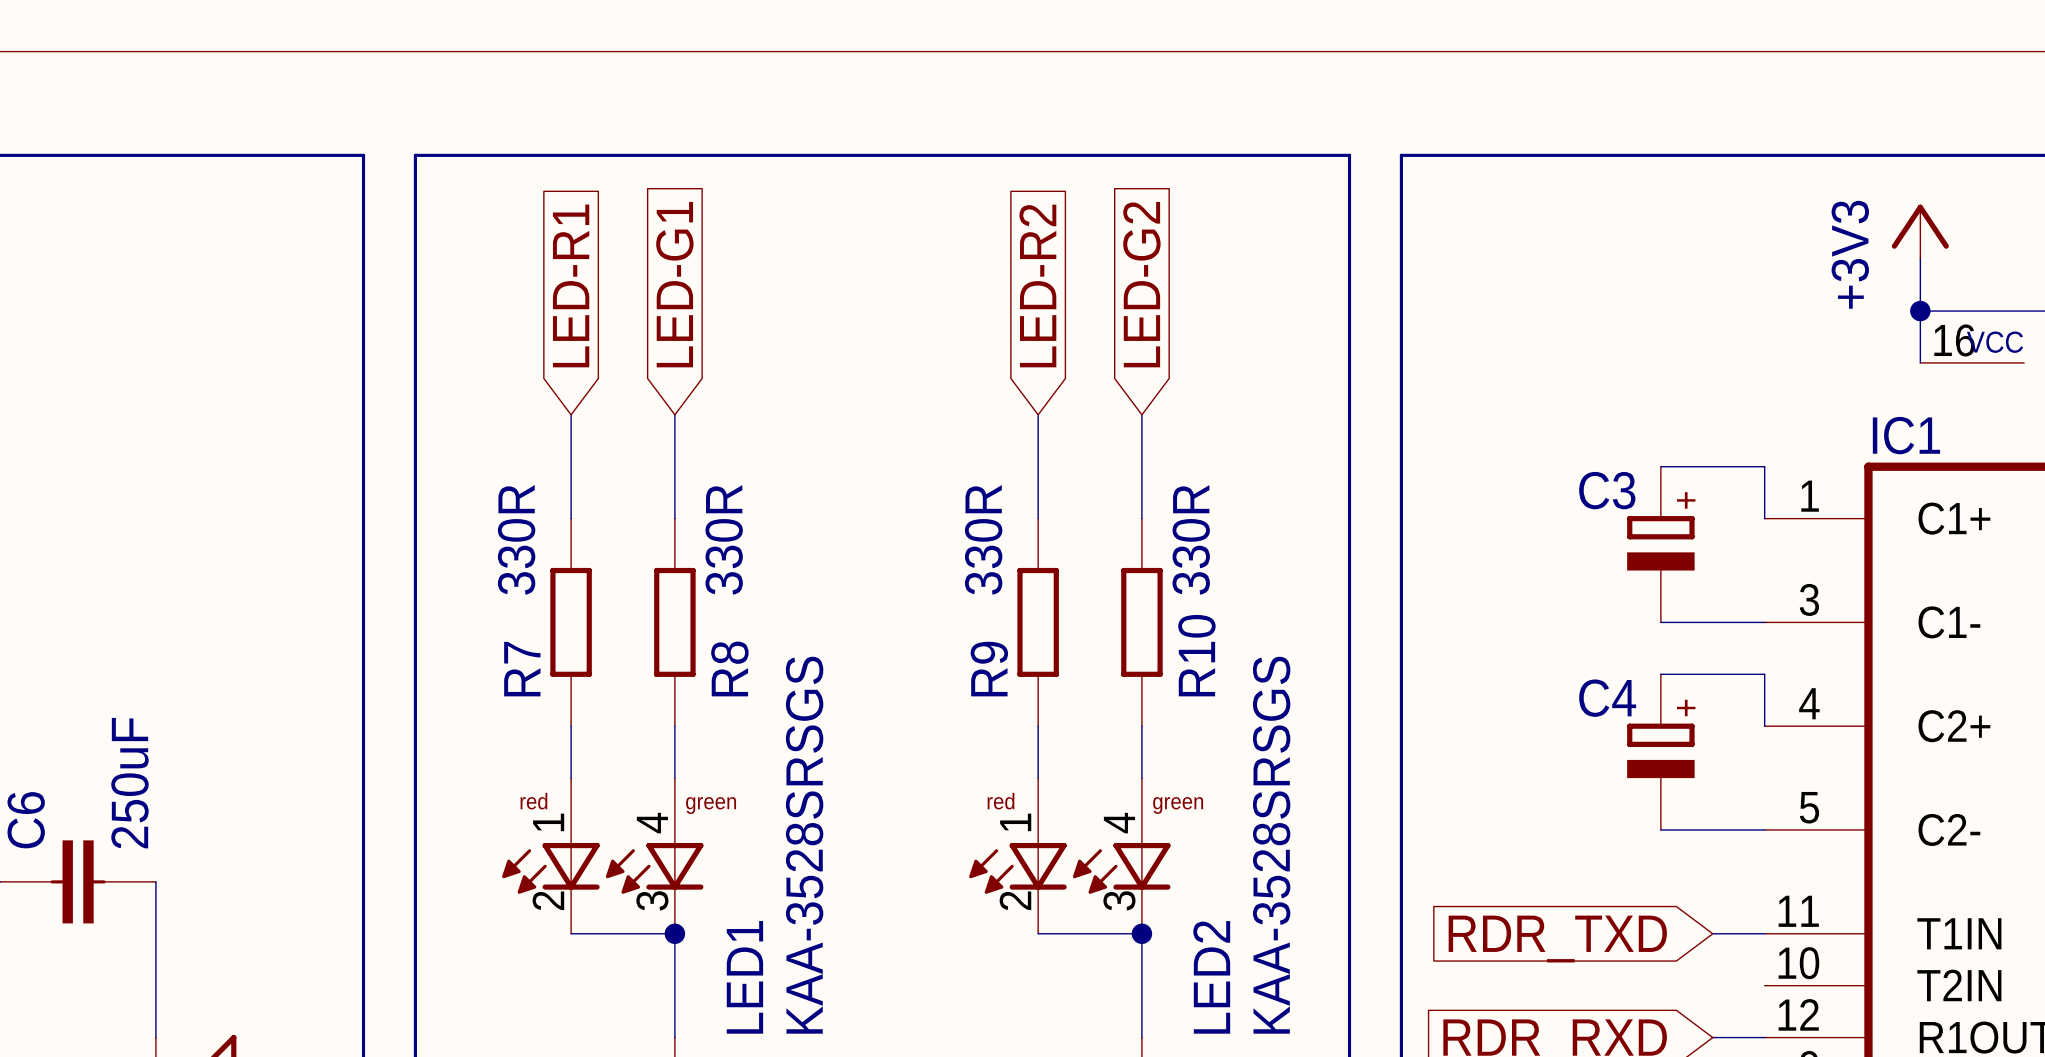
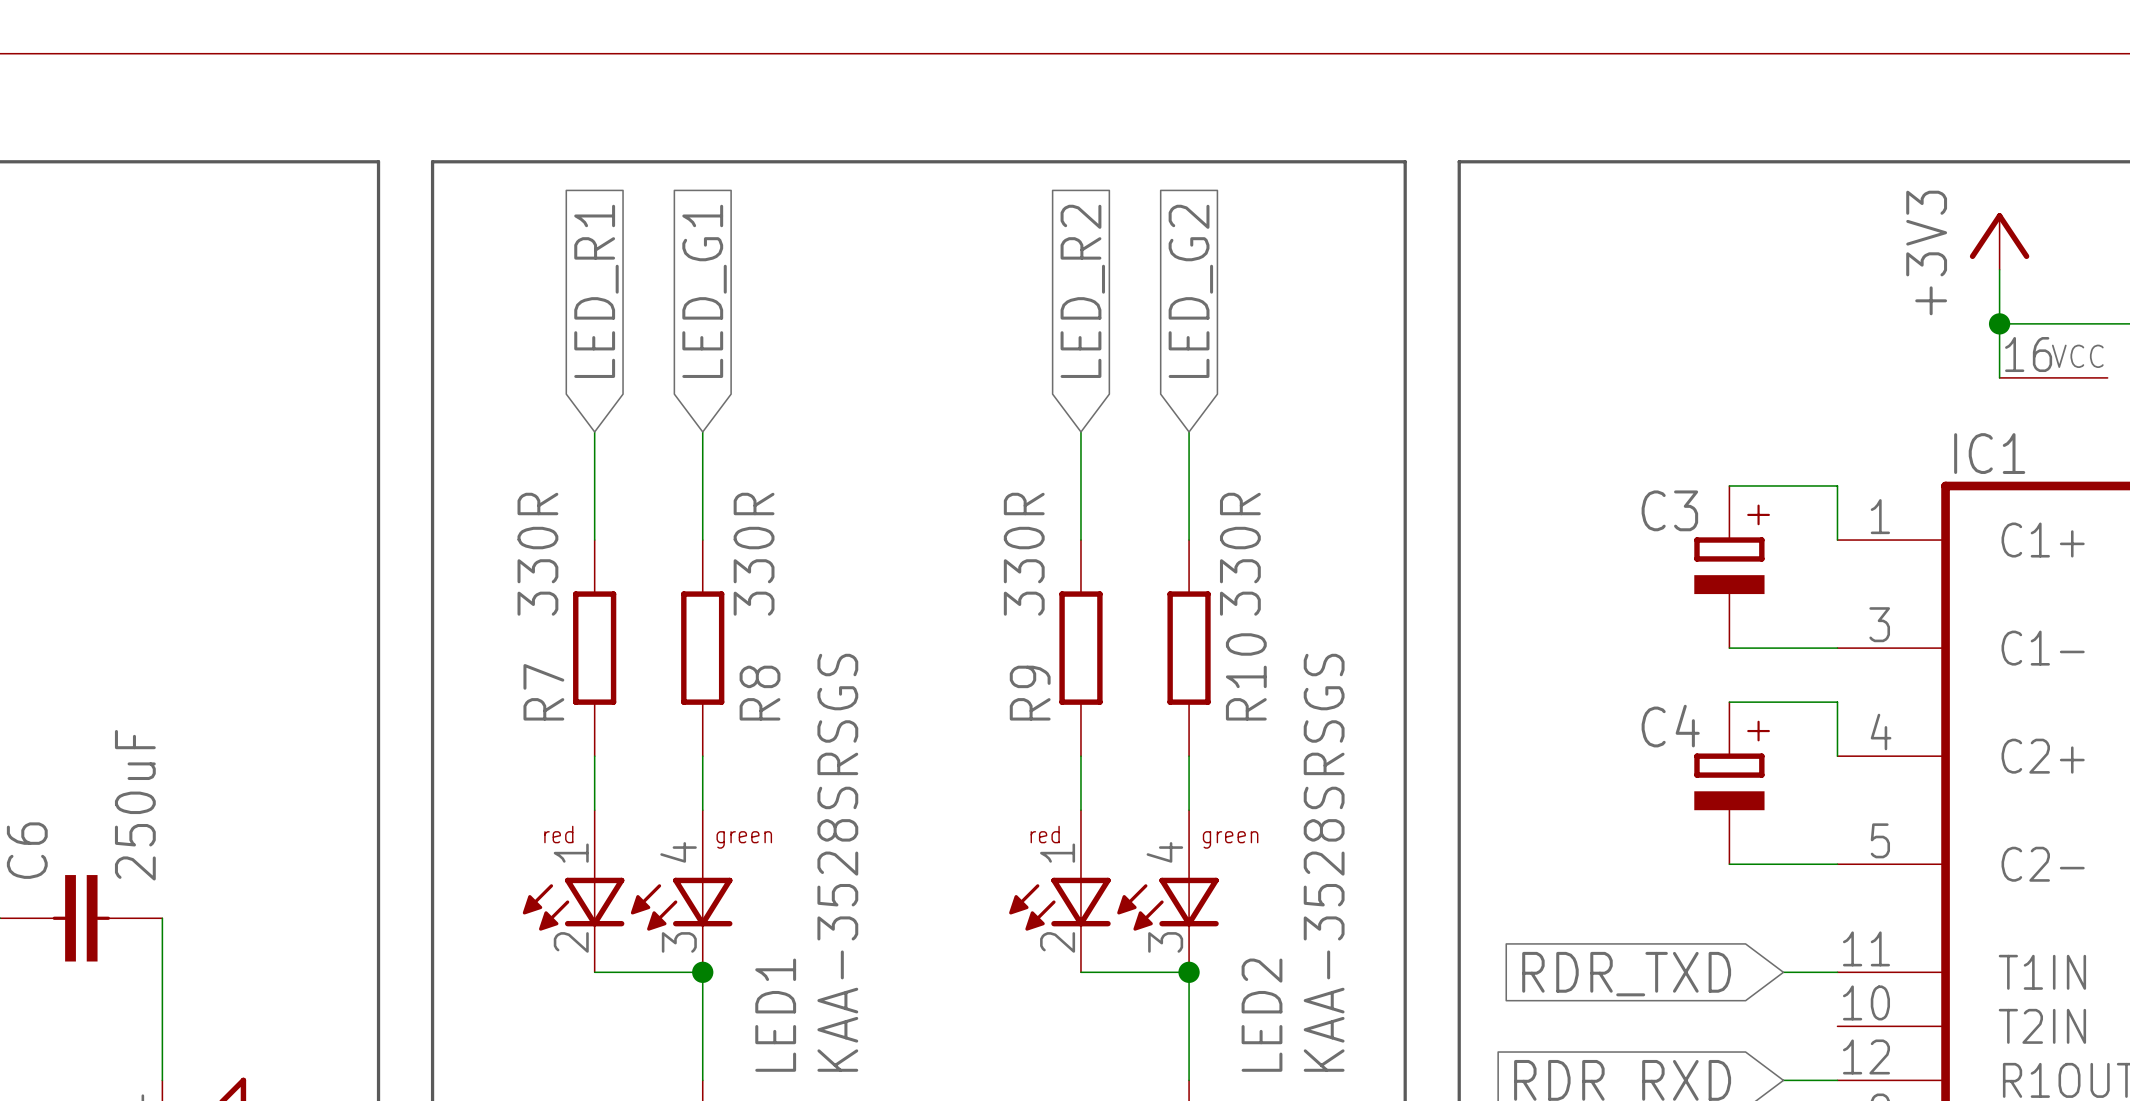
global label: LED-G1 (674, 284) -> LED_G1 (704, 291)
global label: LED-G2 (1141, 284) -> LED_G2 (1190, 291)
global label: LED-R1 (571, 285) -> LED_R1 (596, 291)
global label: LED-R2 (1037, 285) -> LED_R2 (1082, 291)

